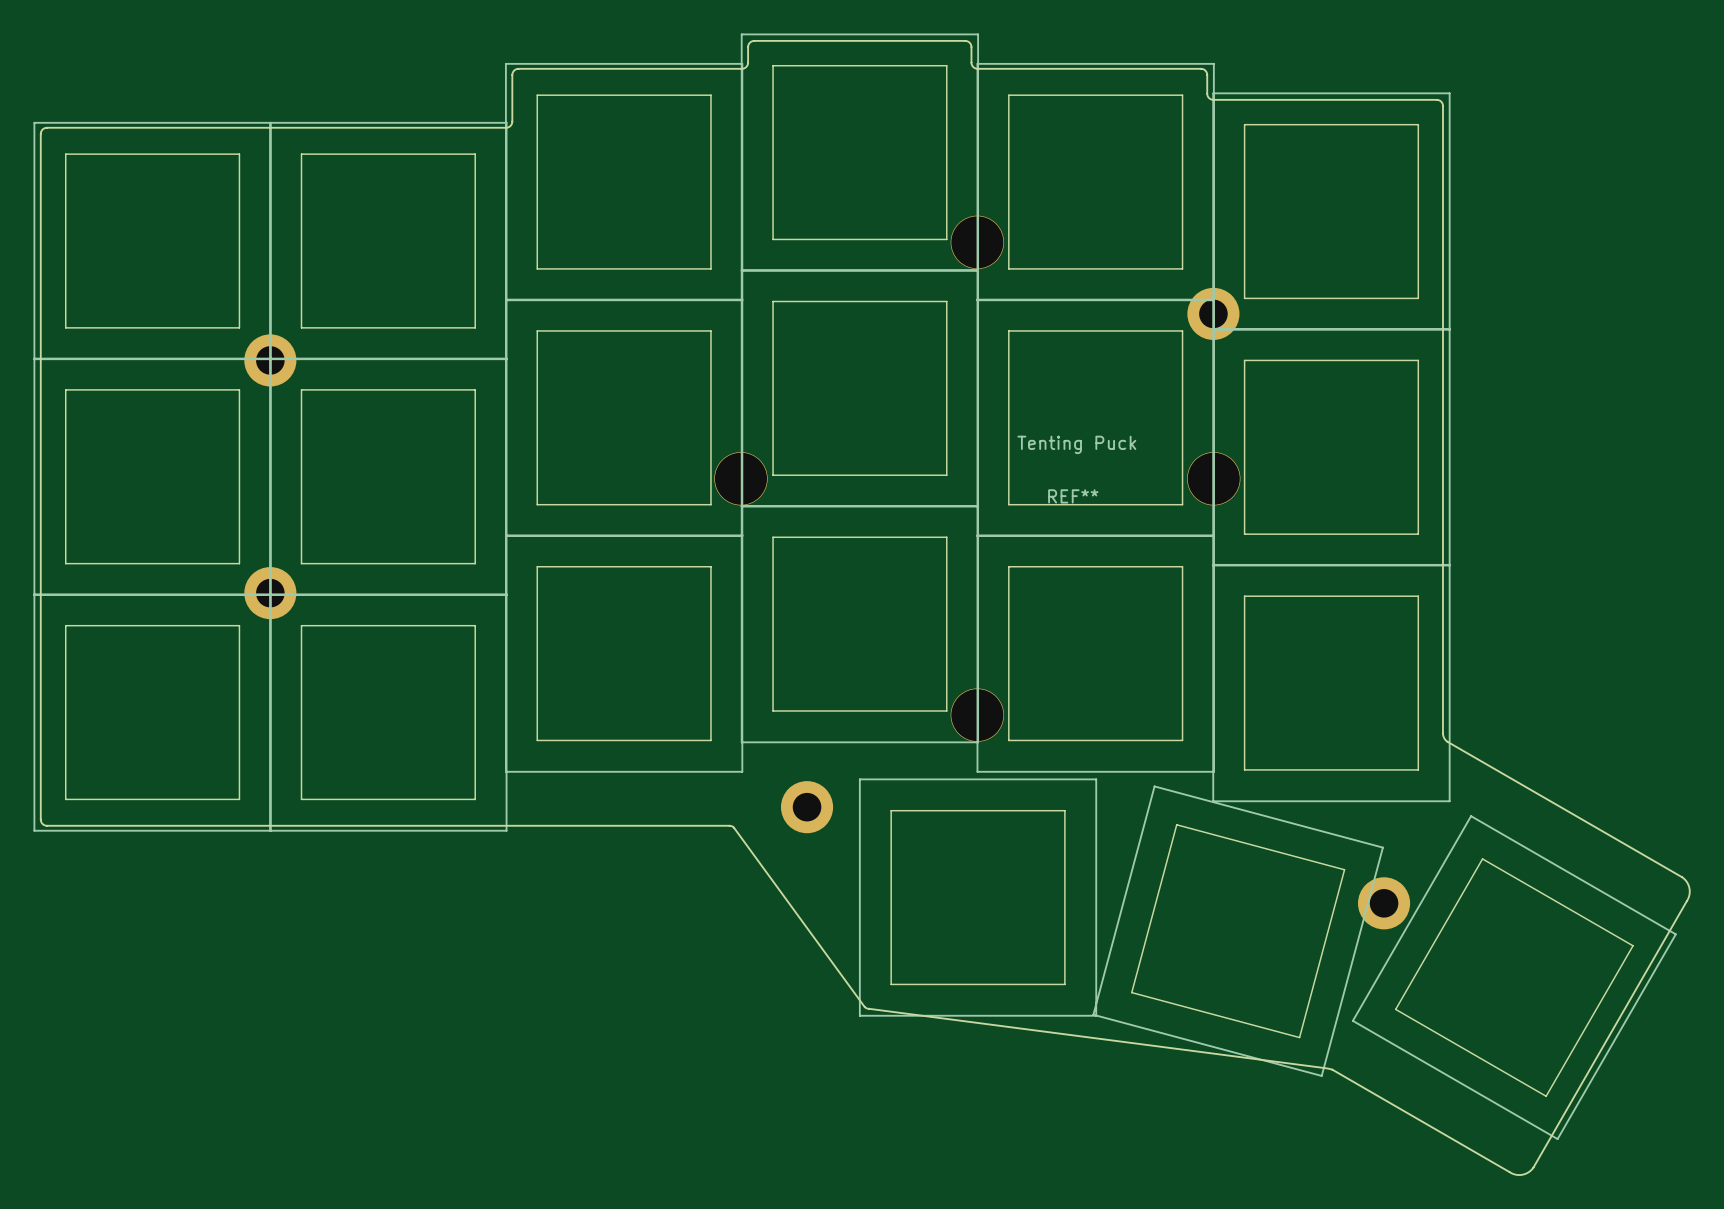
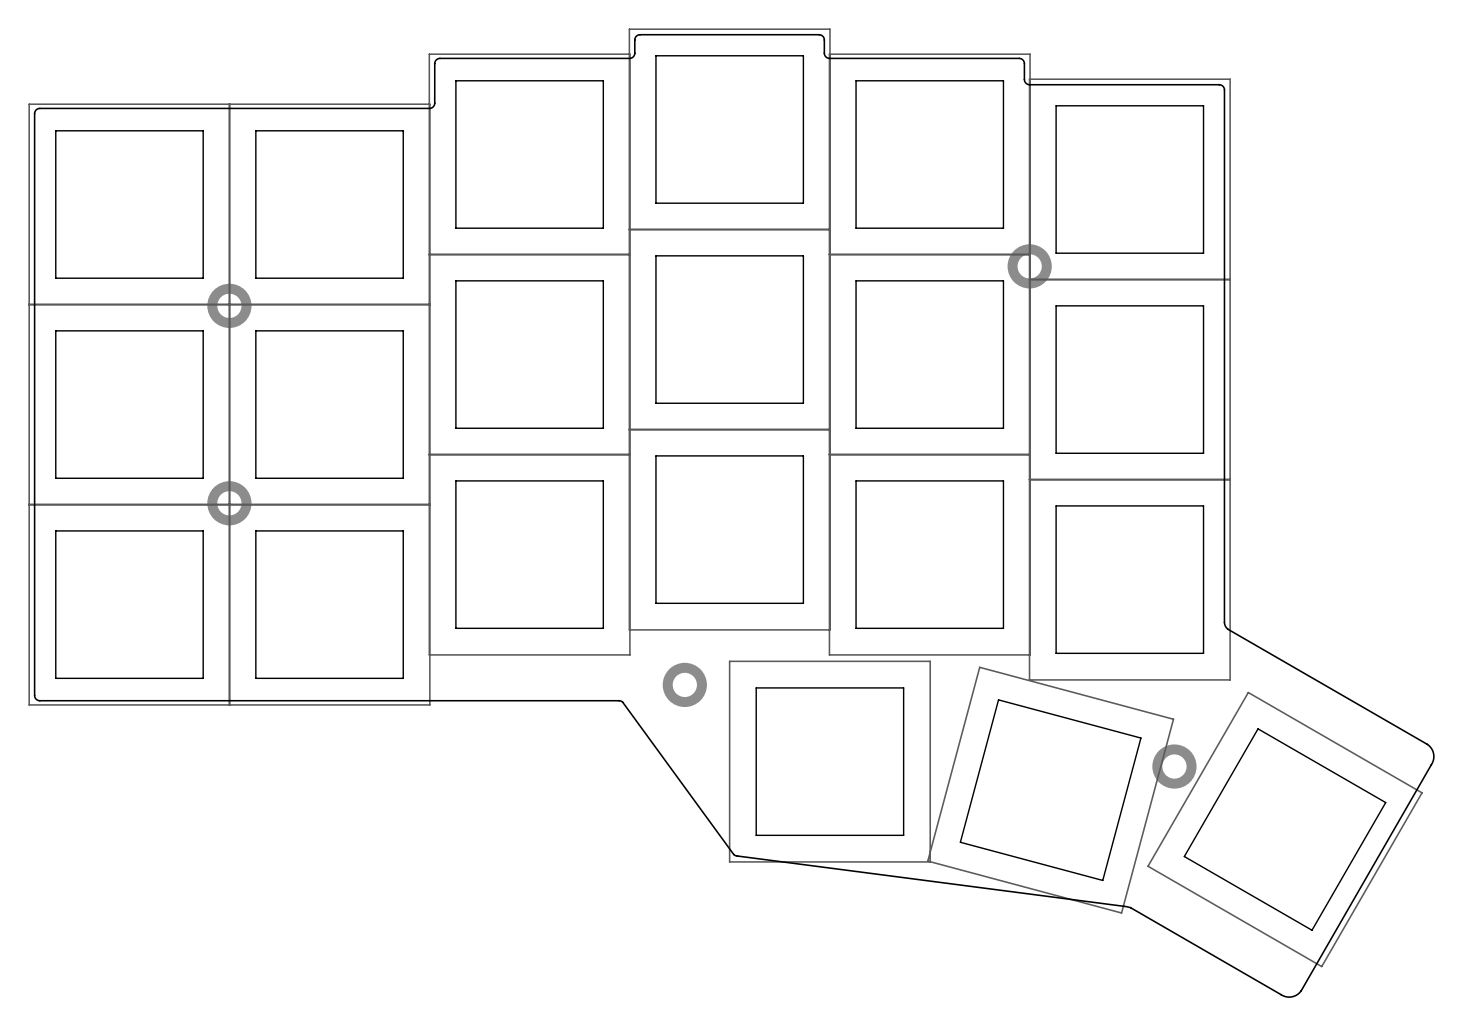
REF**: Tenting Puck (977, 478) -> none

